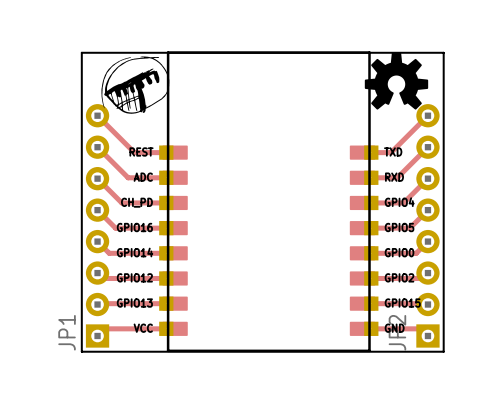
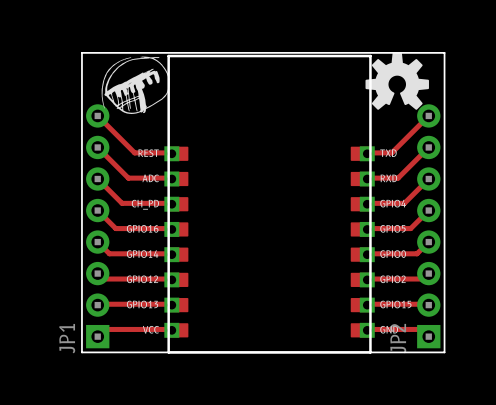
part footprint: [159, 51, 379, 353] -> [164, 54, 375, 354]

